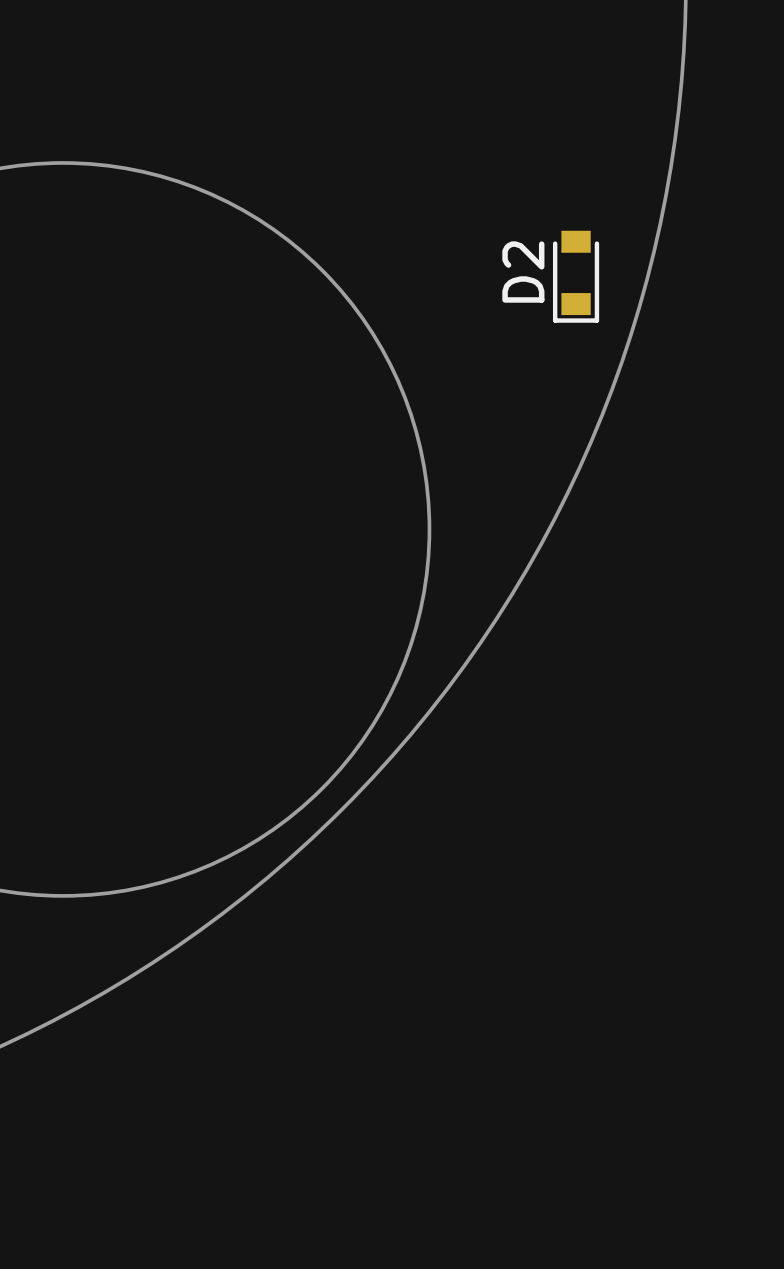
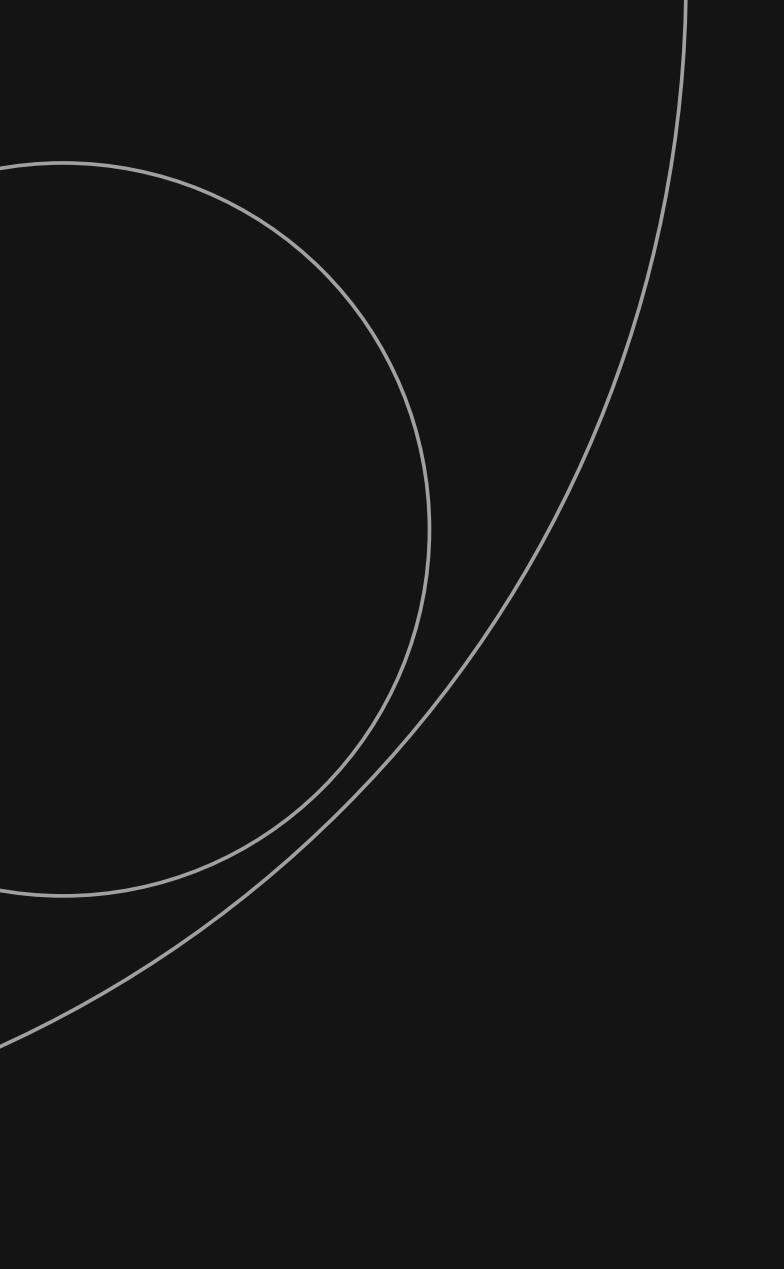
D2: (576, 276) -> none

